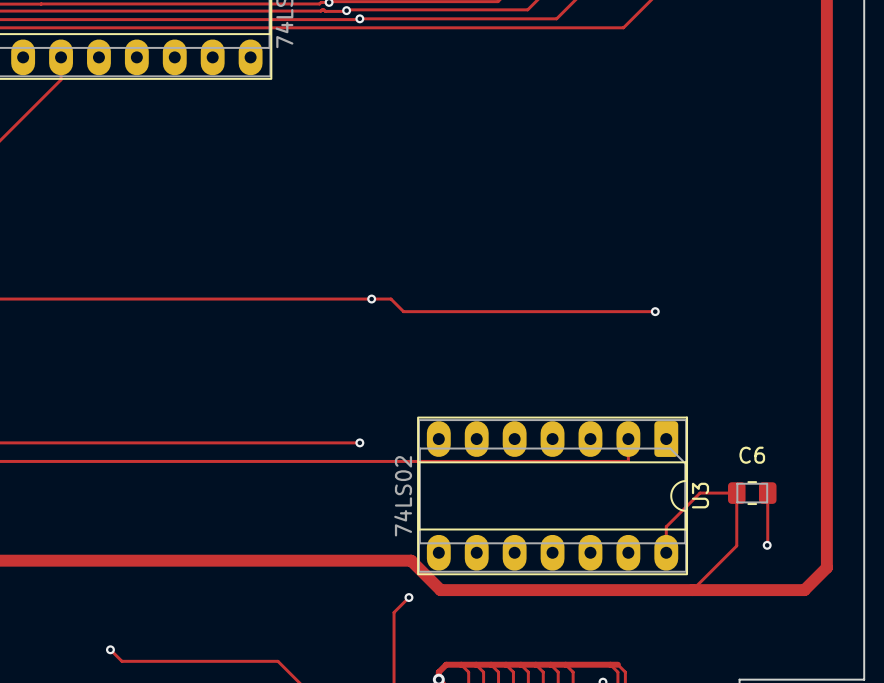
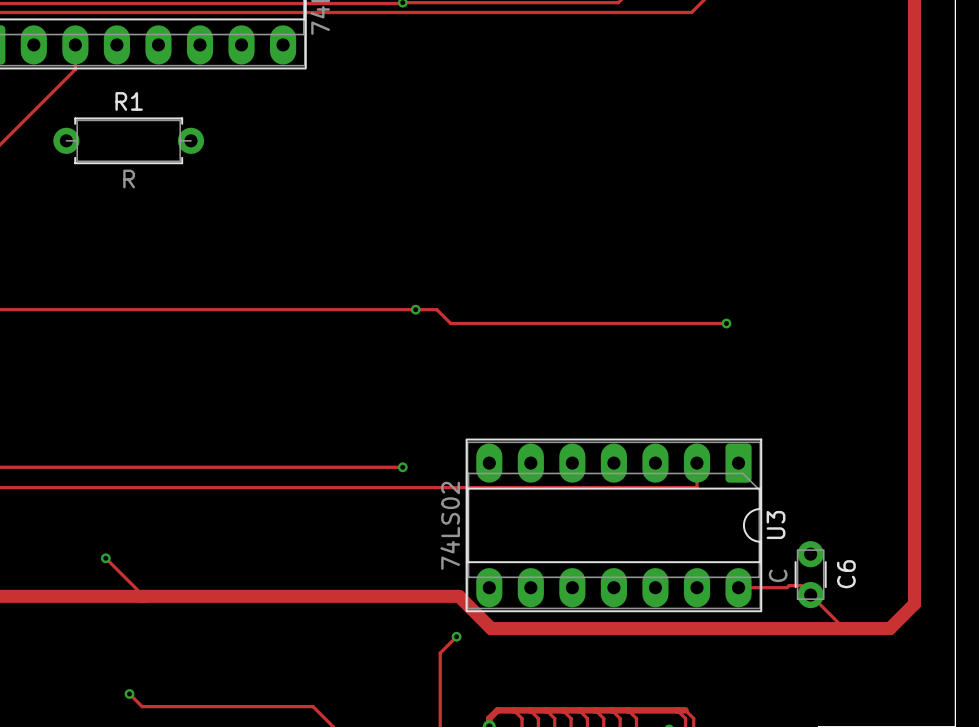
R1: none -> R (128, 140)
C6 name position: C6 (752, 455) -> C6 (846, 574)
C6 footprint: [728, 481, 777, 505] -> [794, 541, 827, 609]
track: (774, 486) (767, 493) (767, 545) -> none
track: none -> (105, 558) (143, 596)
via: none -> (105, 558)
C6 value: none -> C (778, 575)
via: (767, 545) -> none
track: (666, 552) (666, 526) (700, 493) (736, 493) (736, 545) (692, 590) -> (738, 587) (786, 587) (788, 585) (801, 585) (844, 628)

